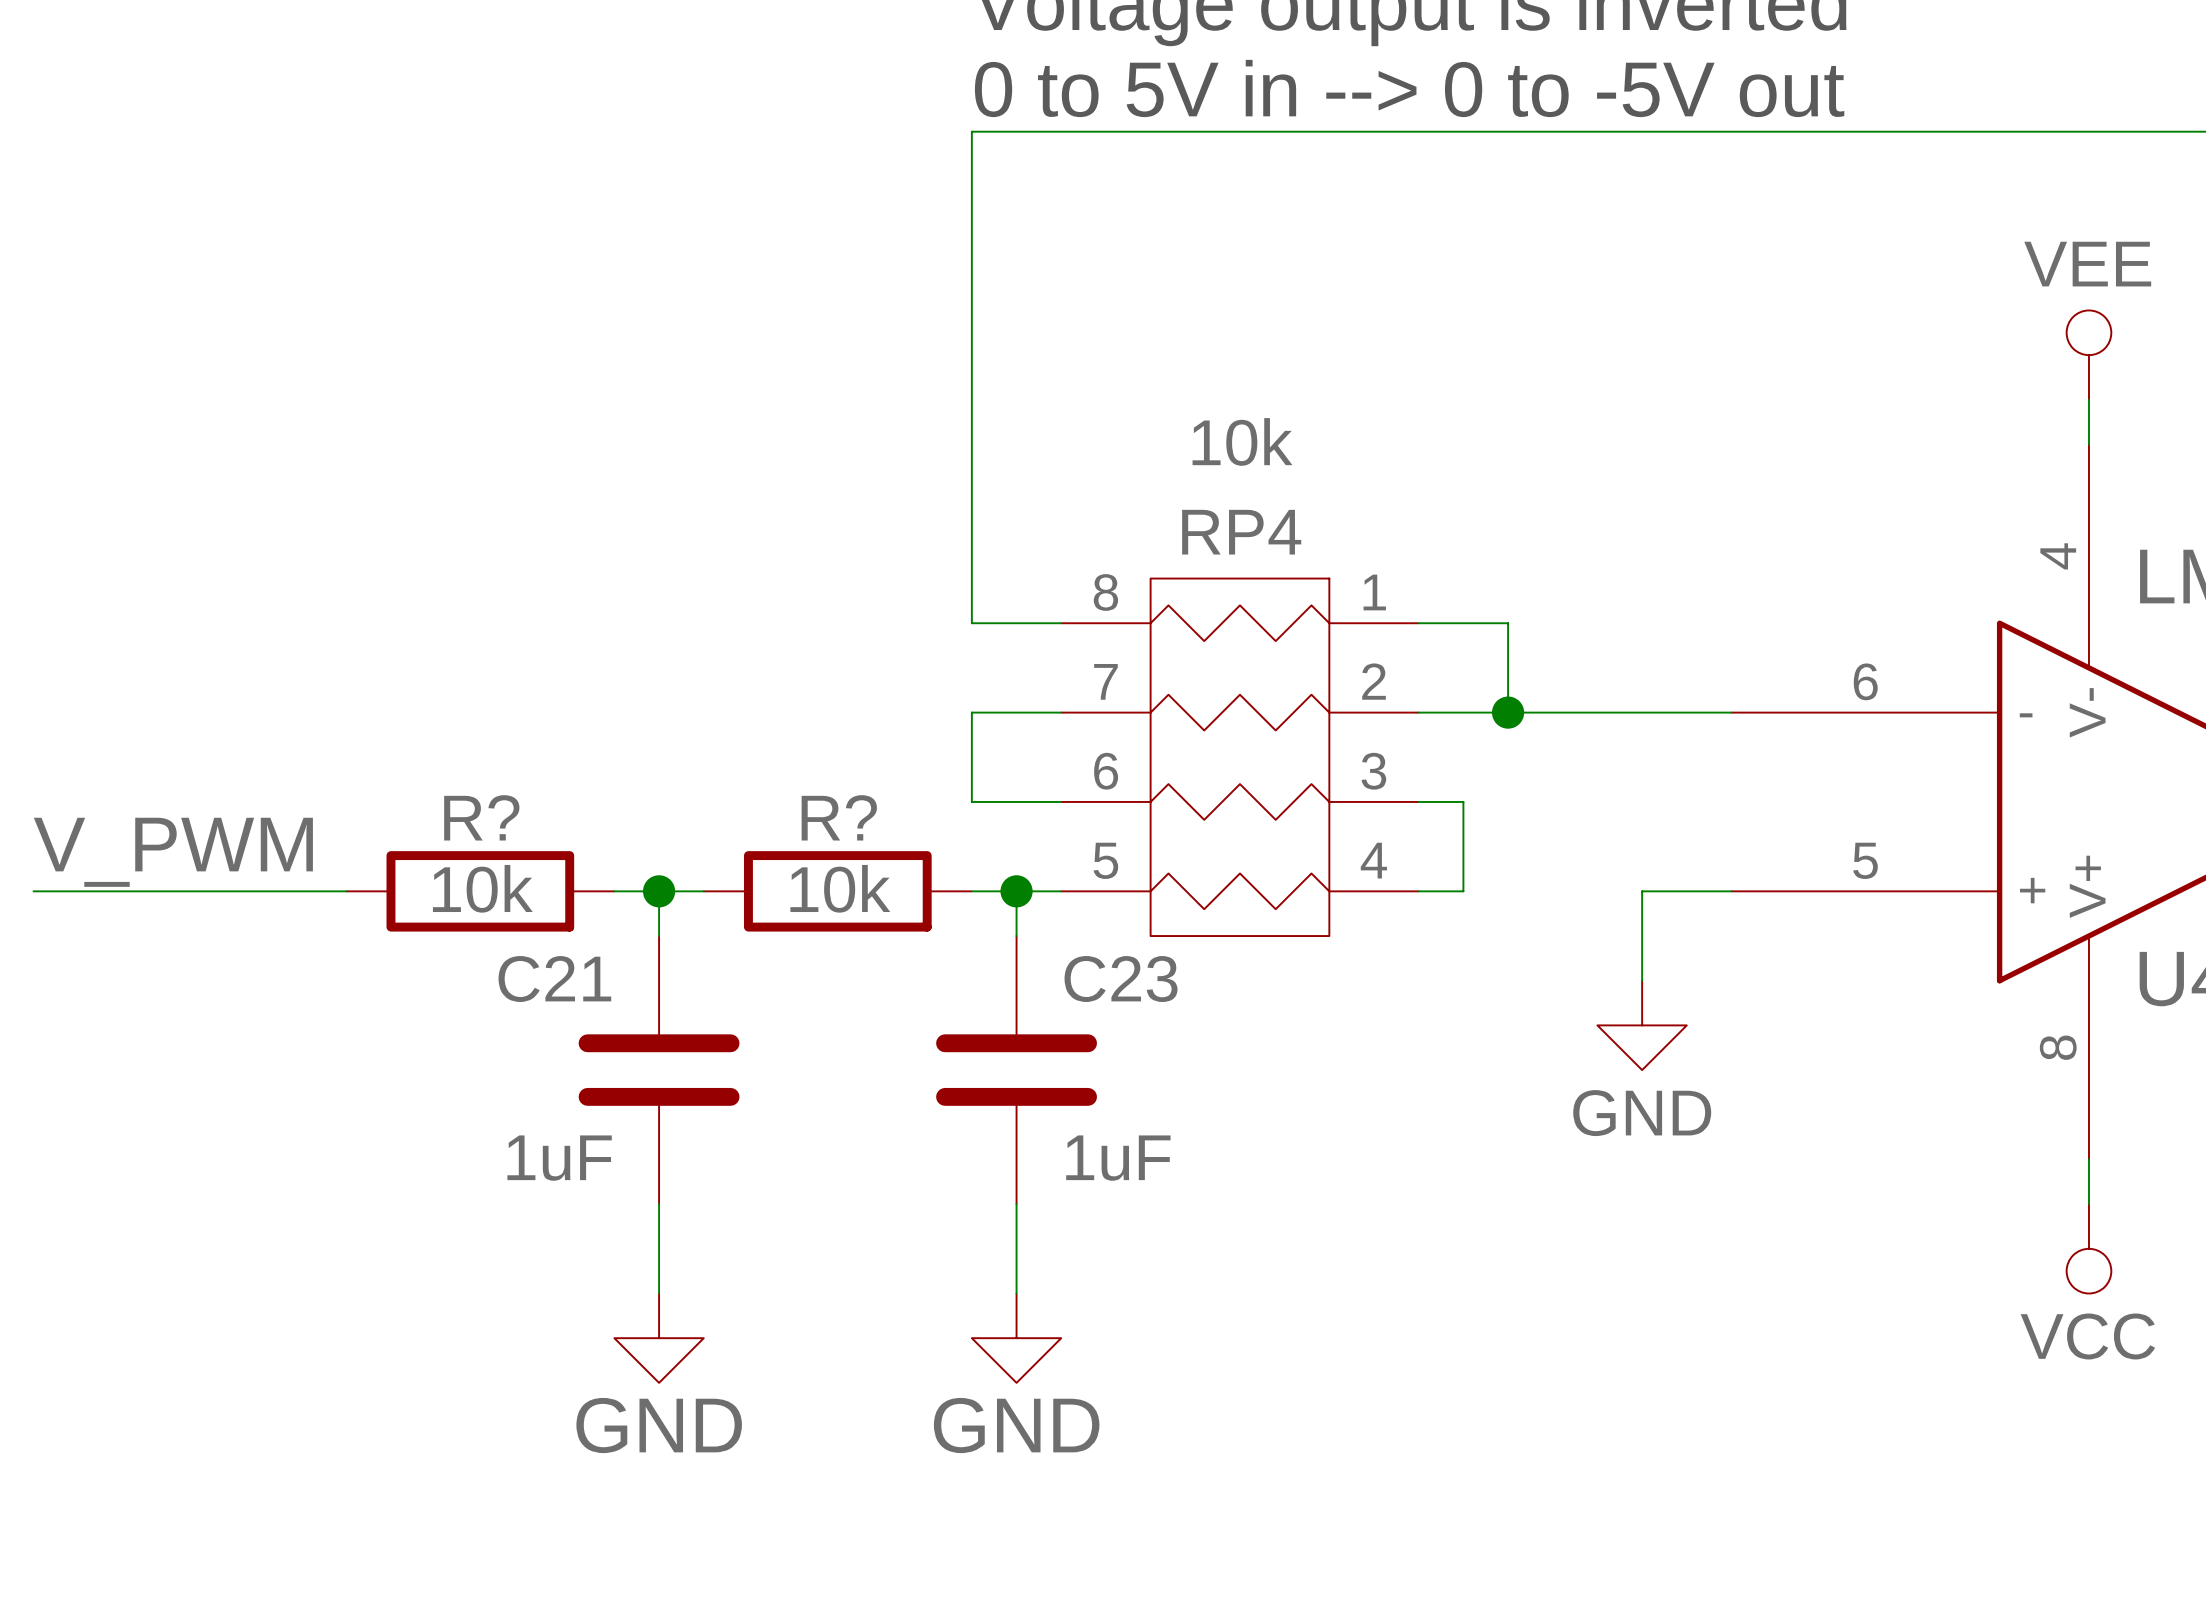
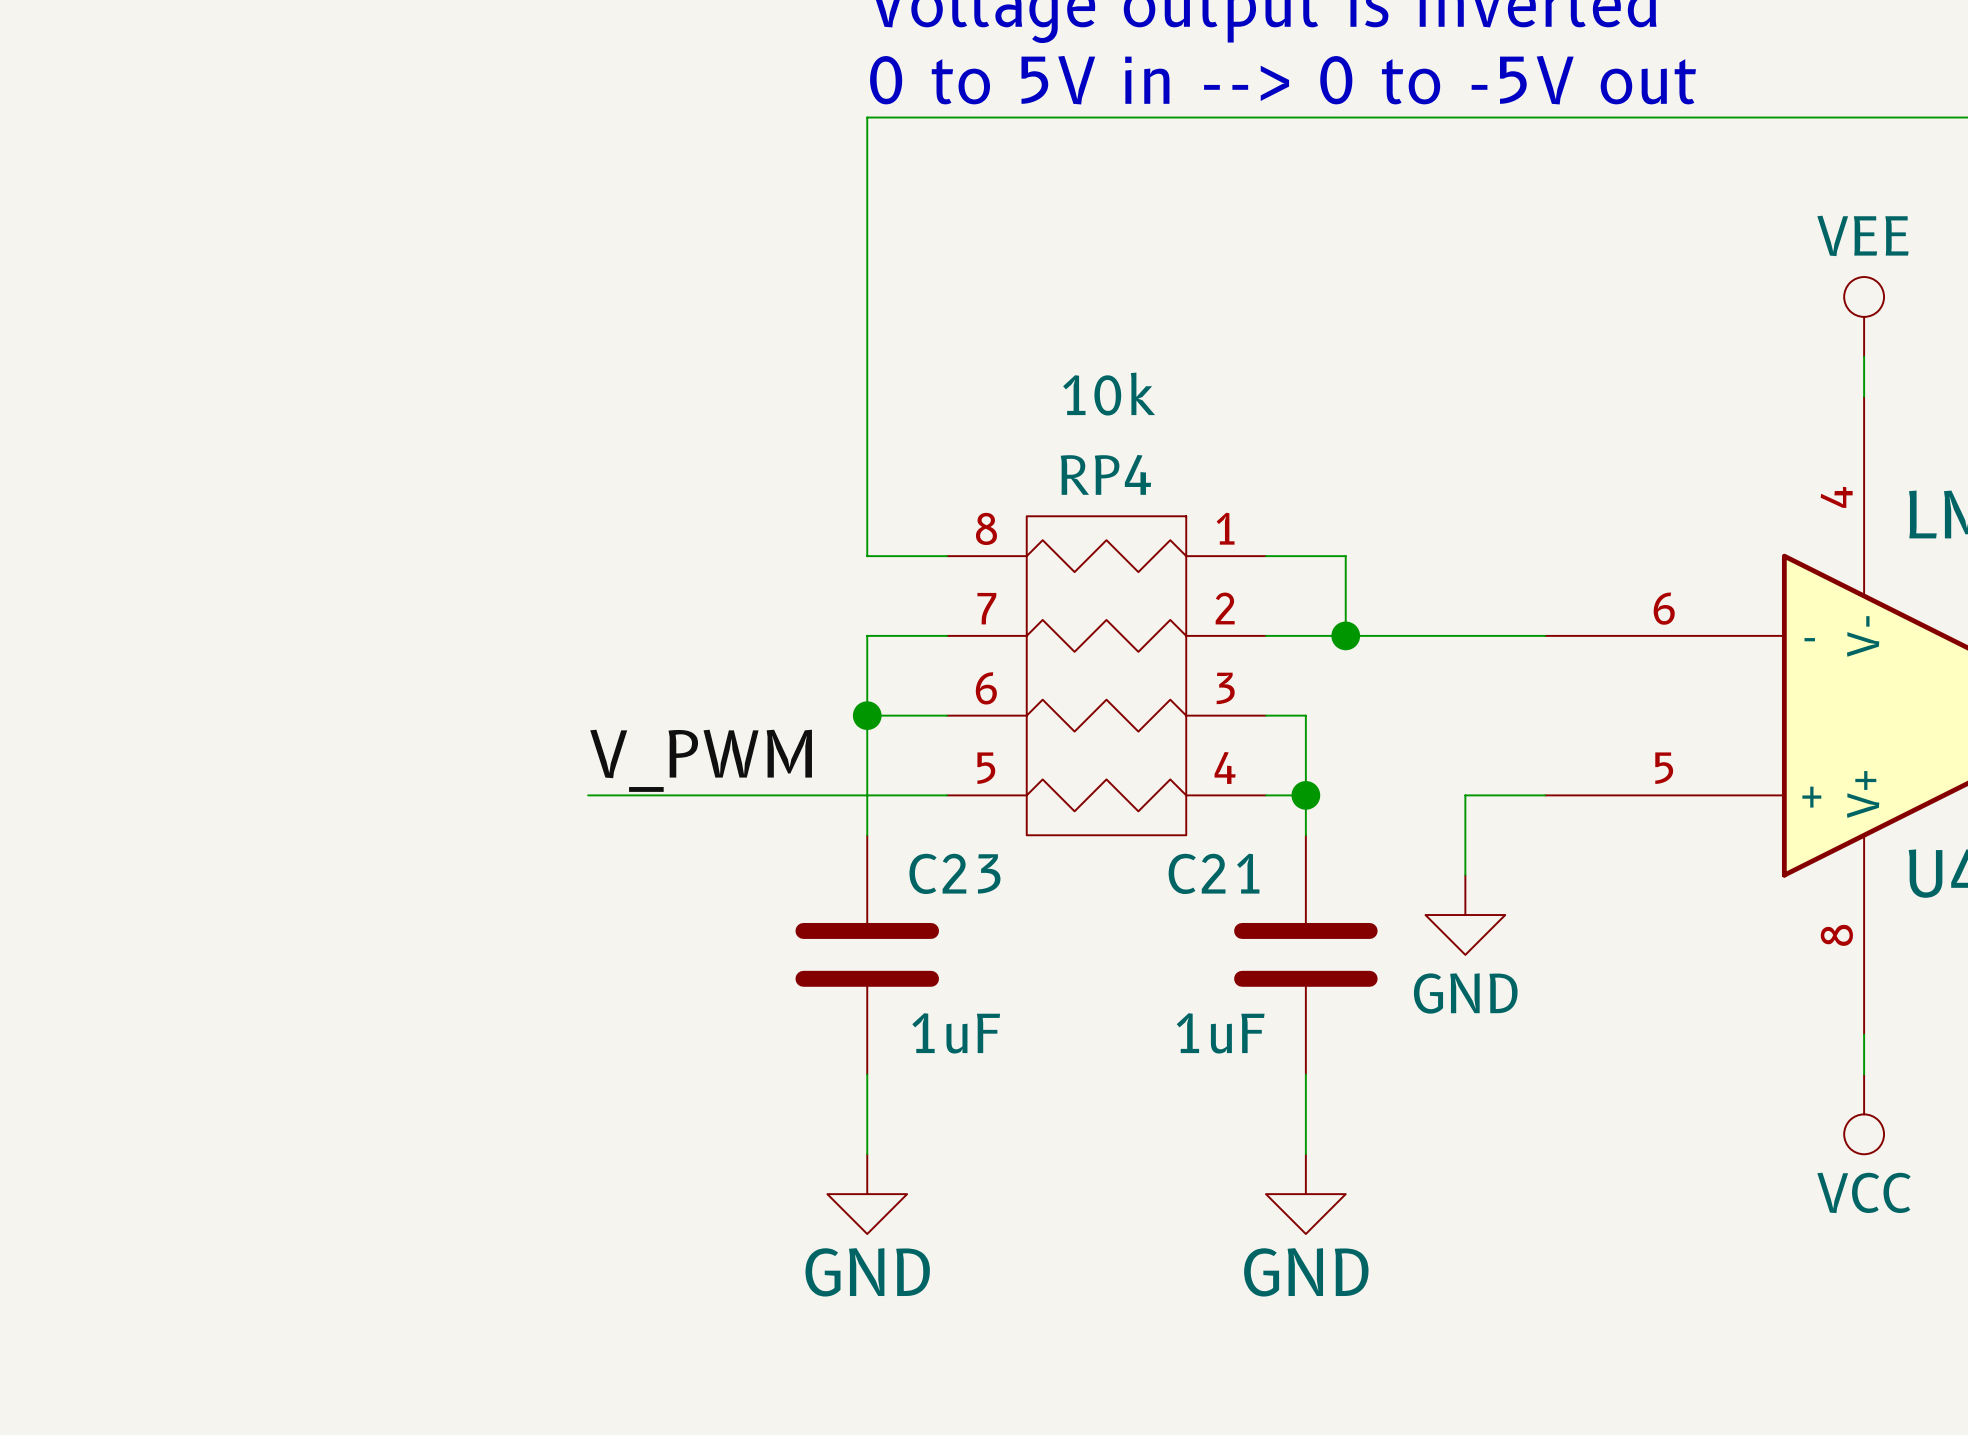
wire: none -> (867, 715) (867, 835)
label position: V_PWM (173, 852) -> V_PWM (701, 760)
wire: (33, 891) (346, 891) -> none
R?: 10k (480, 891) -> none
wire: (614, 891) (659, 891) (659, 936) -> none
junction: (659, 891) -> none
wire: none -> (628, 795) (867, 795)
R?: 10k (837, 891) -> none
wire: (1016, 891) (1016, 936) -> (1305, 795) (1305, 835)
junction position: (1016, 891) -> (867, 715)
junction: none -> (1305, 795)
C21 position: (659, 1070) -> (1305, 954)
C23 position: (1016, 1070) -> (867, 954)
wire: (659, 1204) (659, 1293) -> (867, 1074) (867, 1154)
wire: (1016, 1204) (1016, 1293) -> (1305, 1074) (1305, 1154)
power symbol: GND (659, 1338) -> none
power symbol position: GND (1016, 1338) -> GND (867, 1194)
power symbol: none -> GND (1305, 1194)

